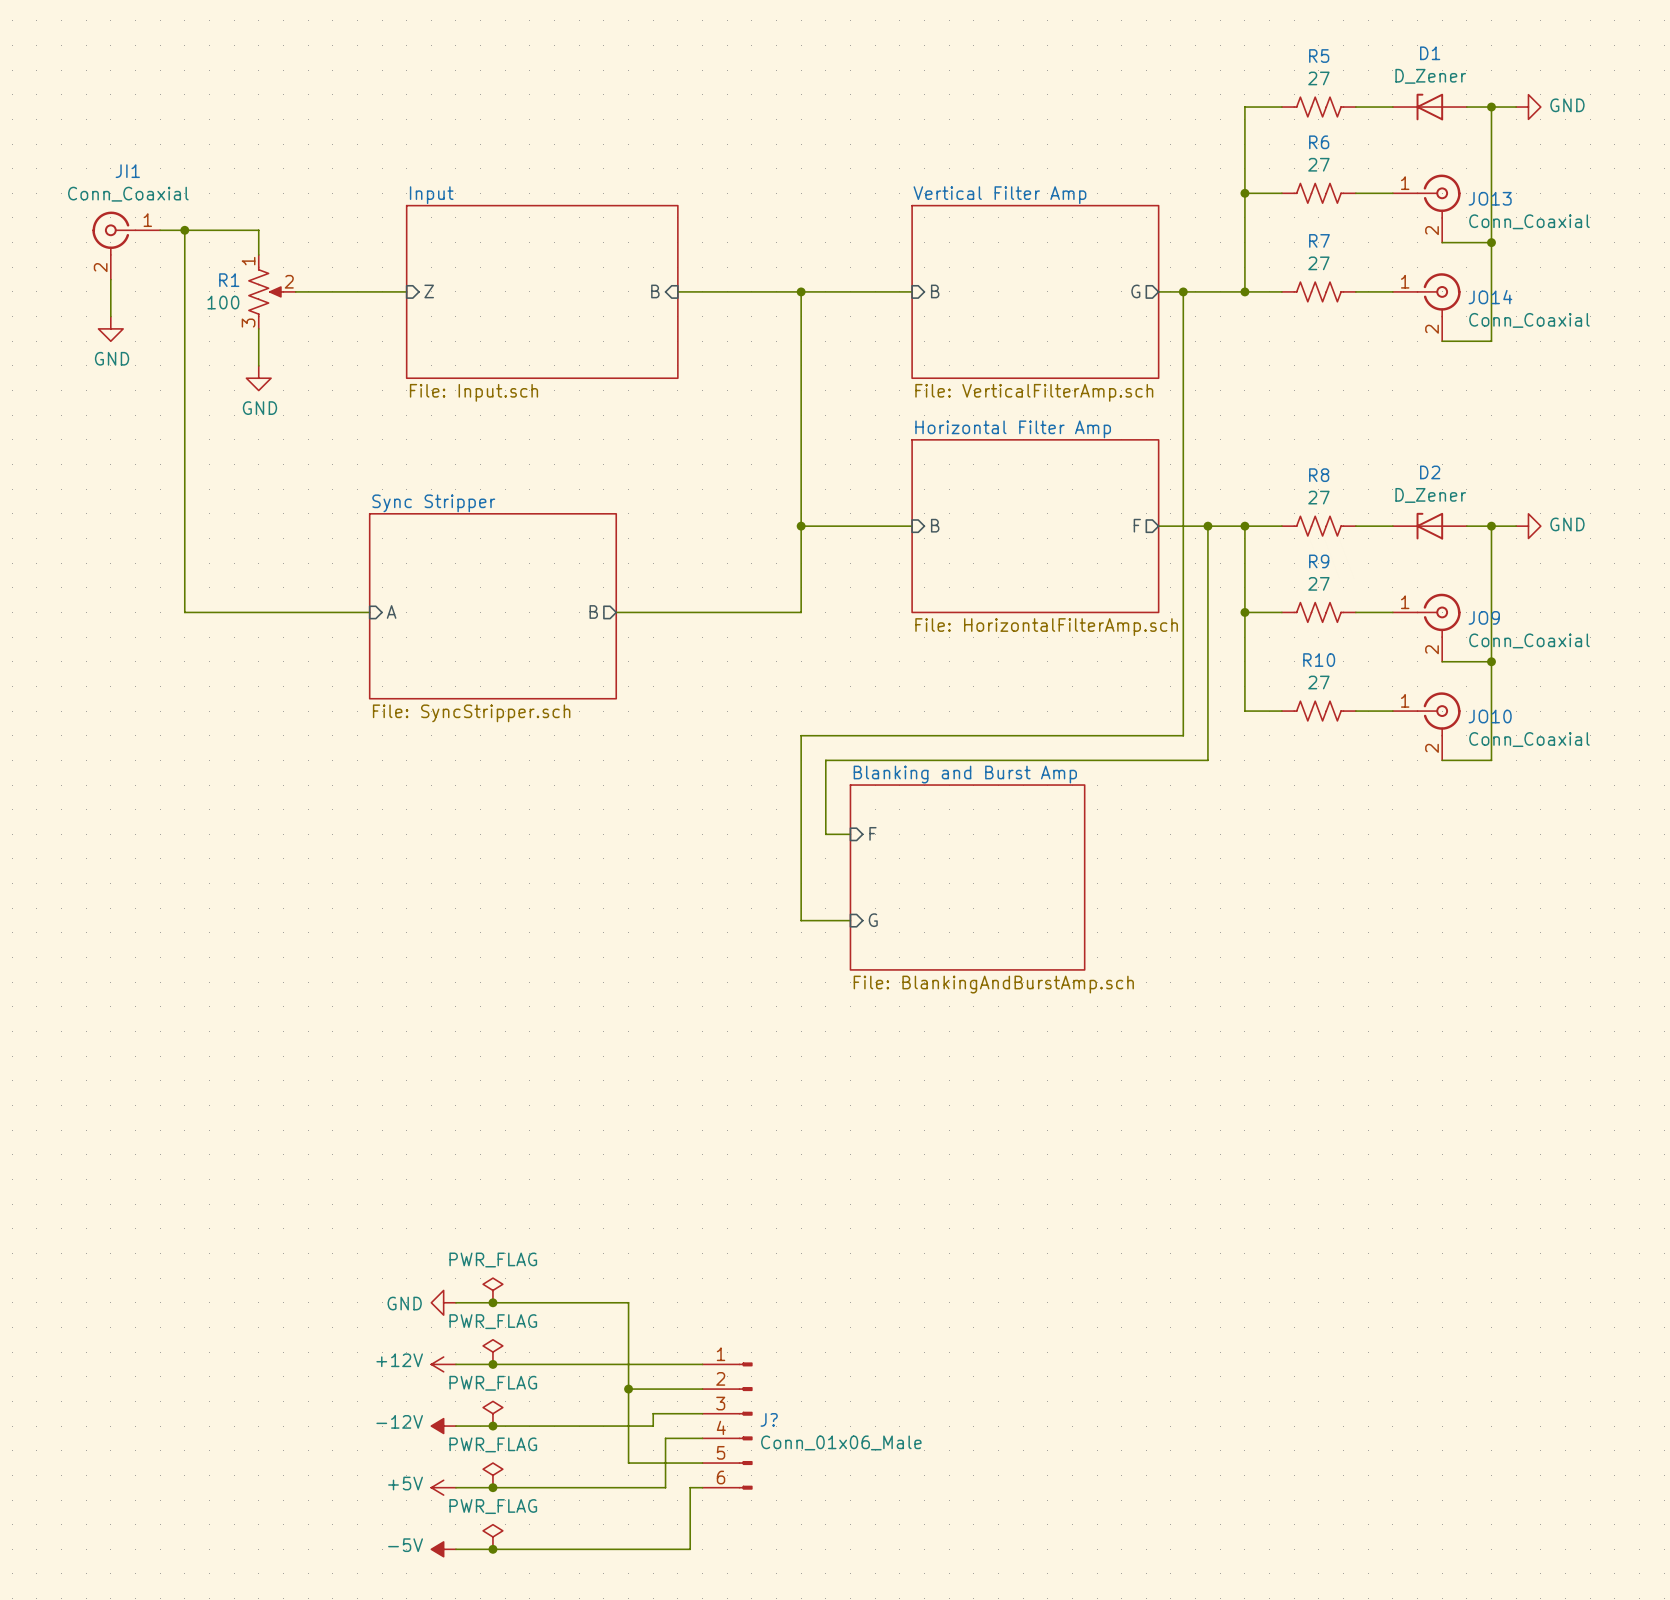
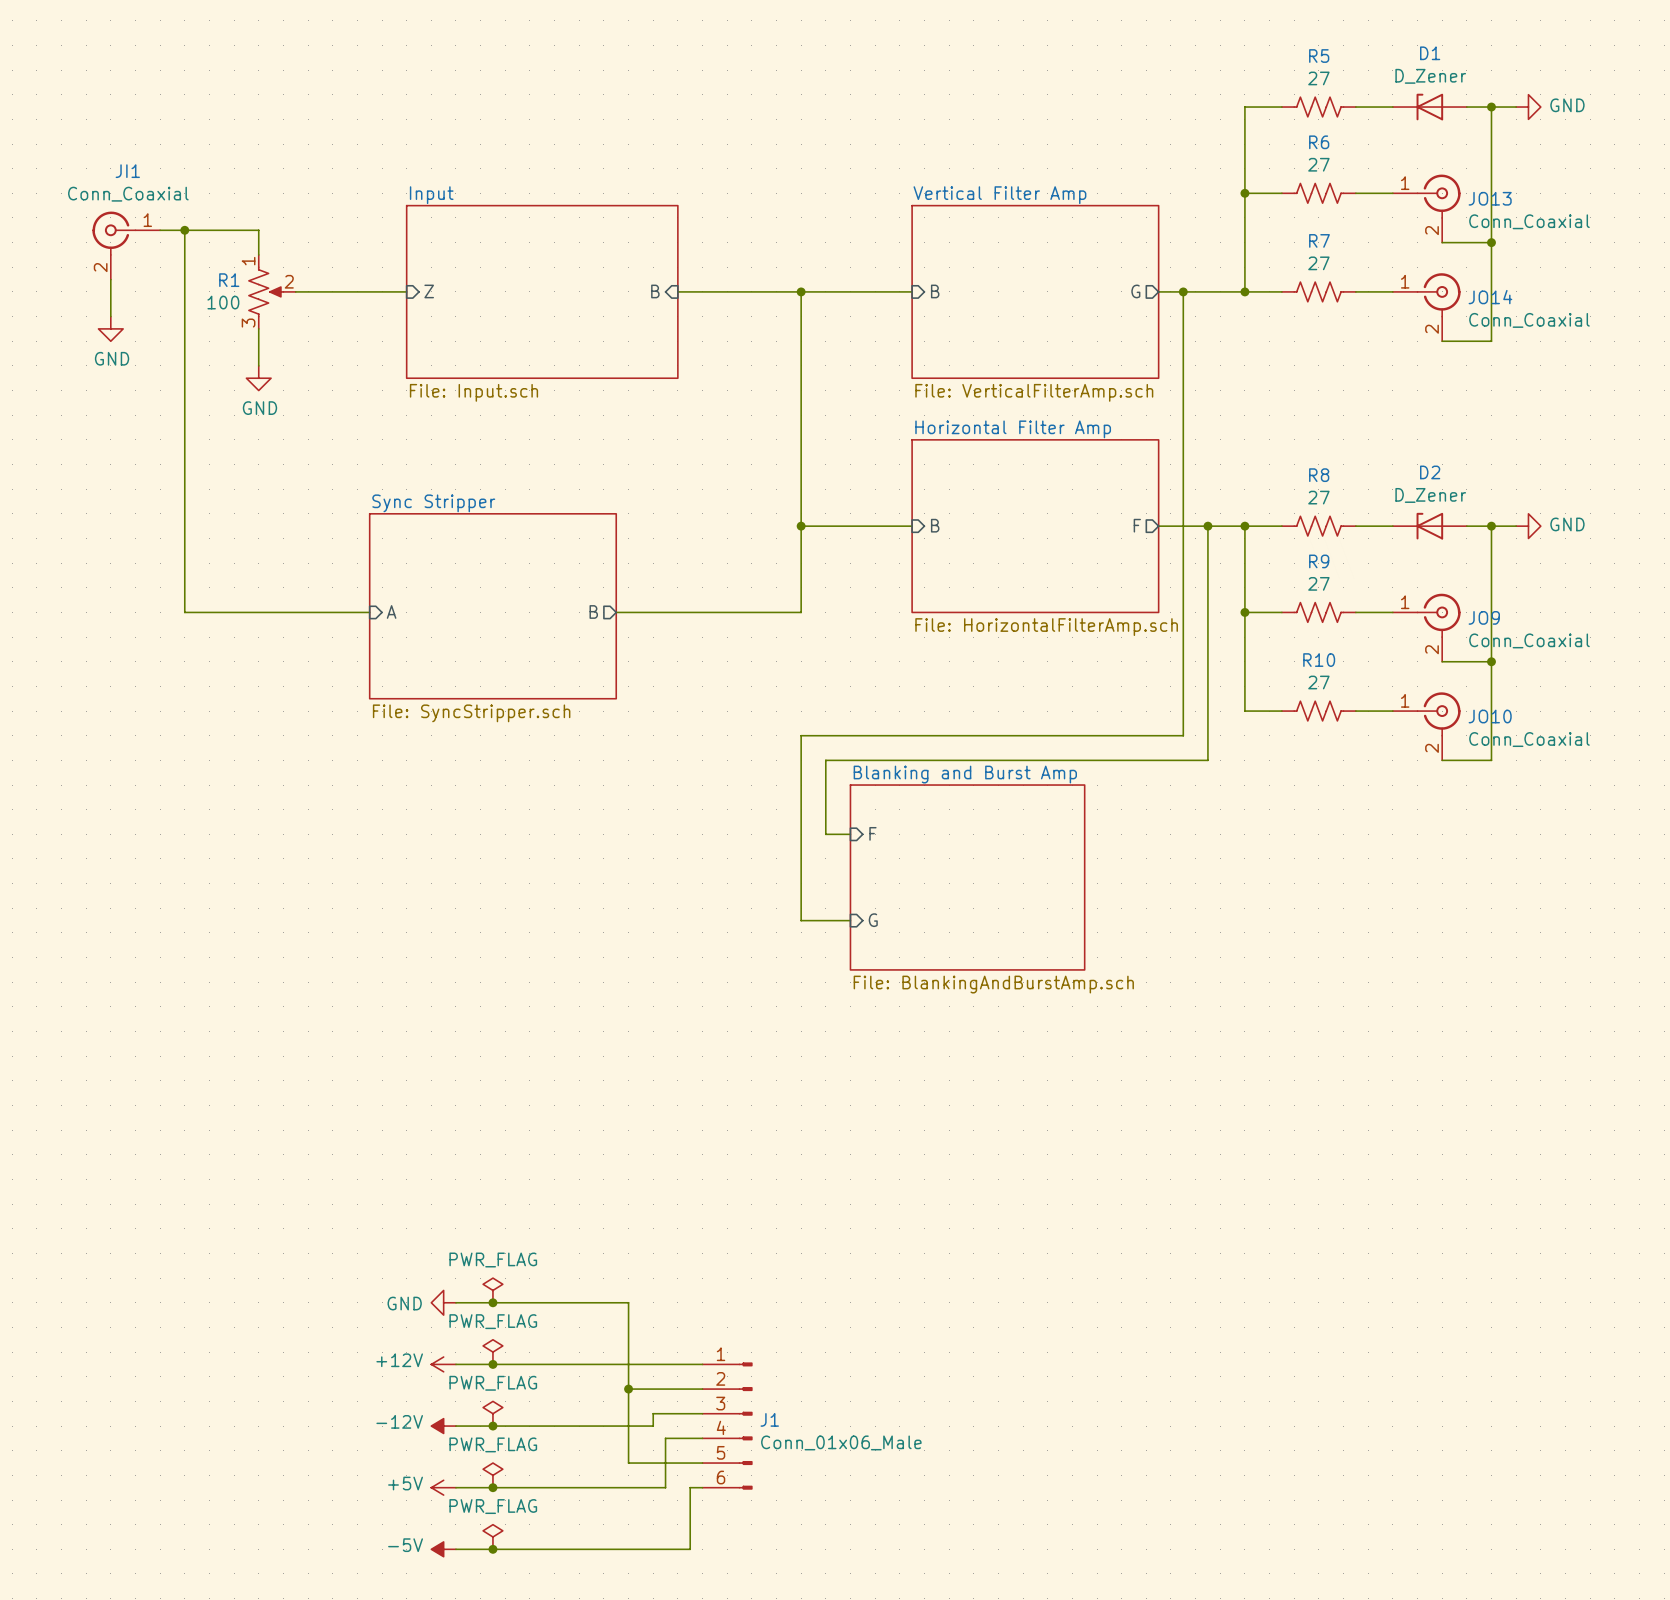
J? name: J? (769, 1419) -> J1 (769, 1419)

